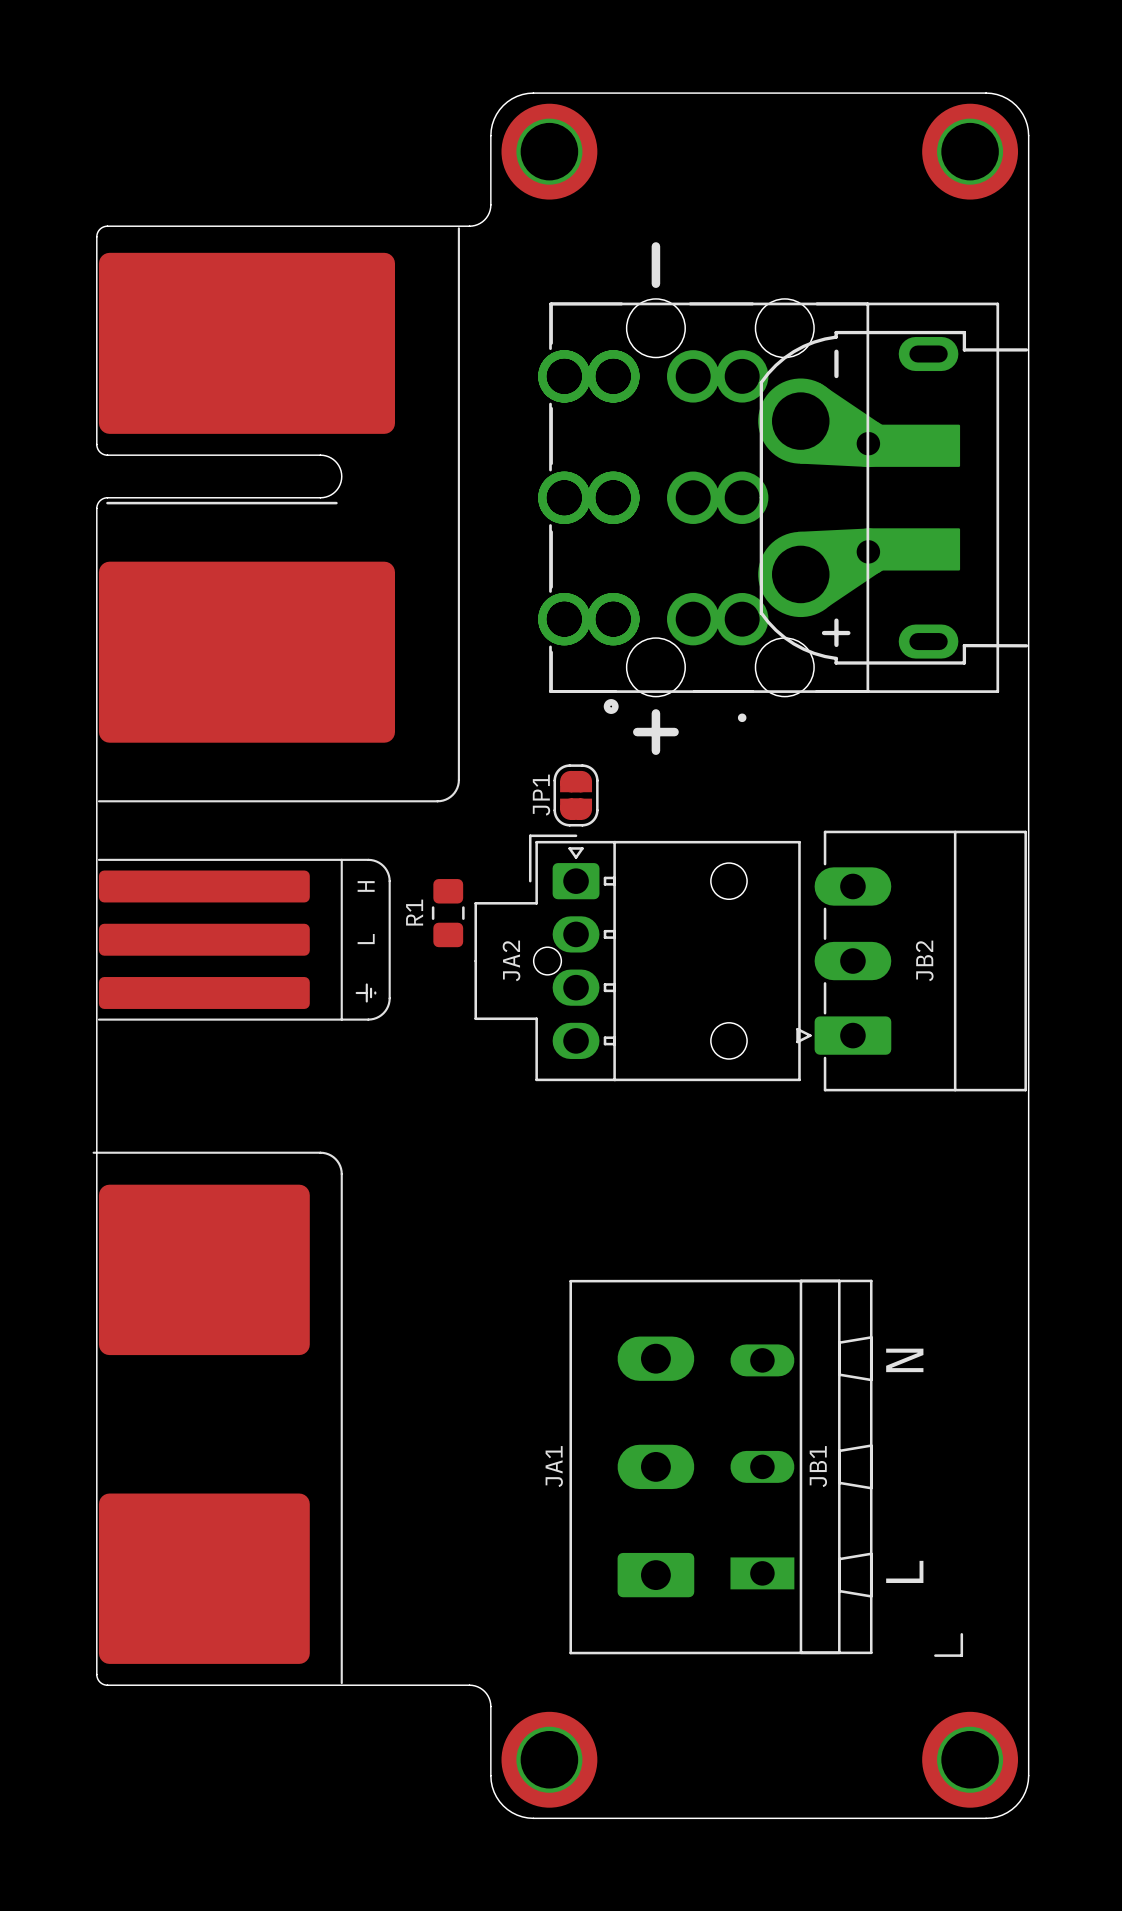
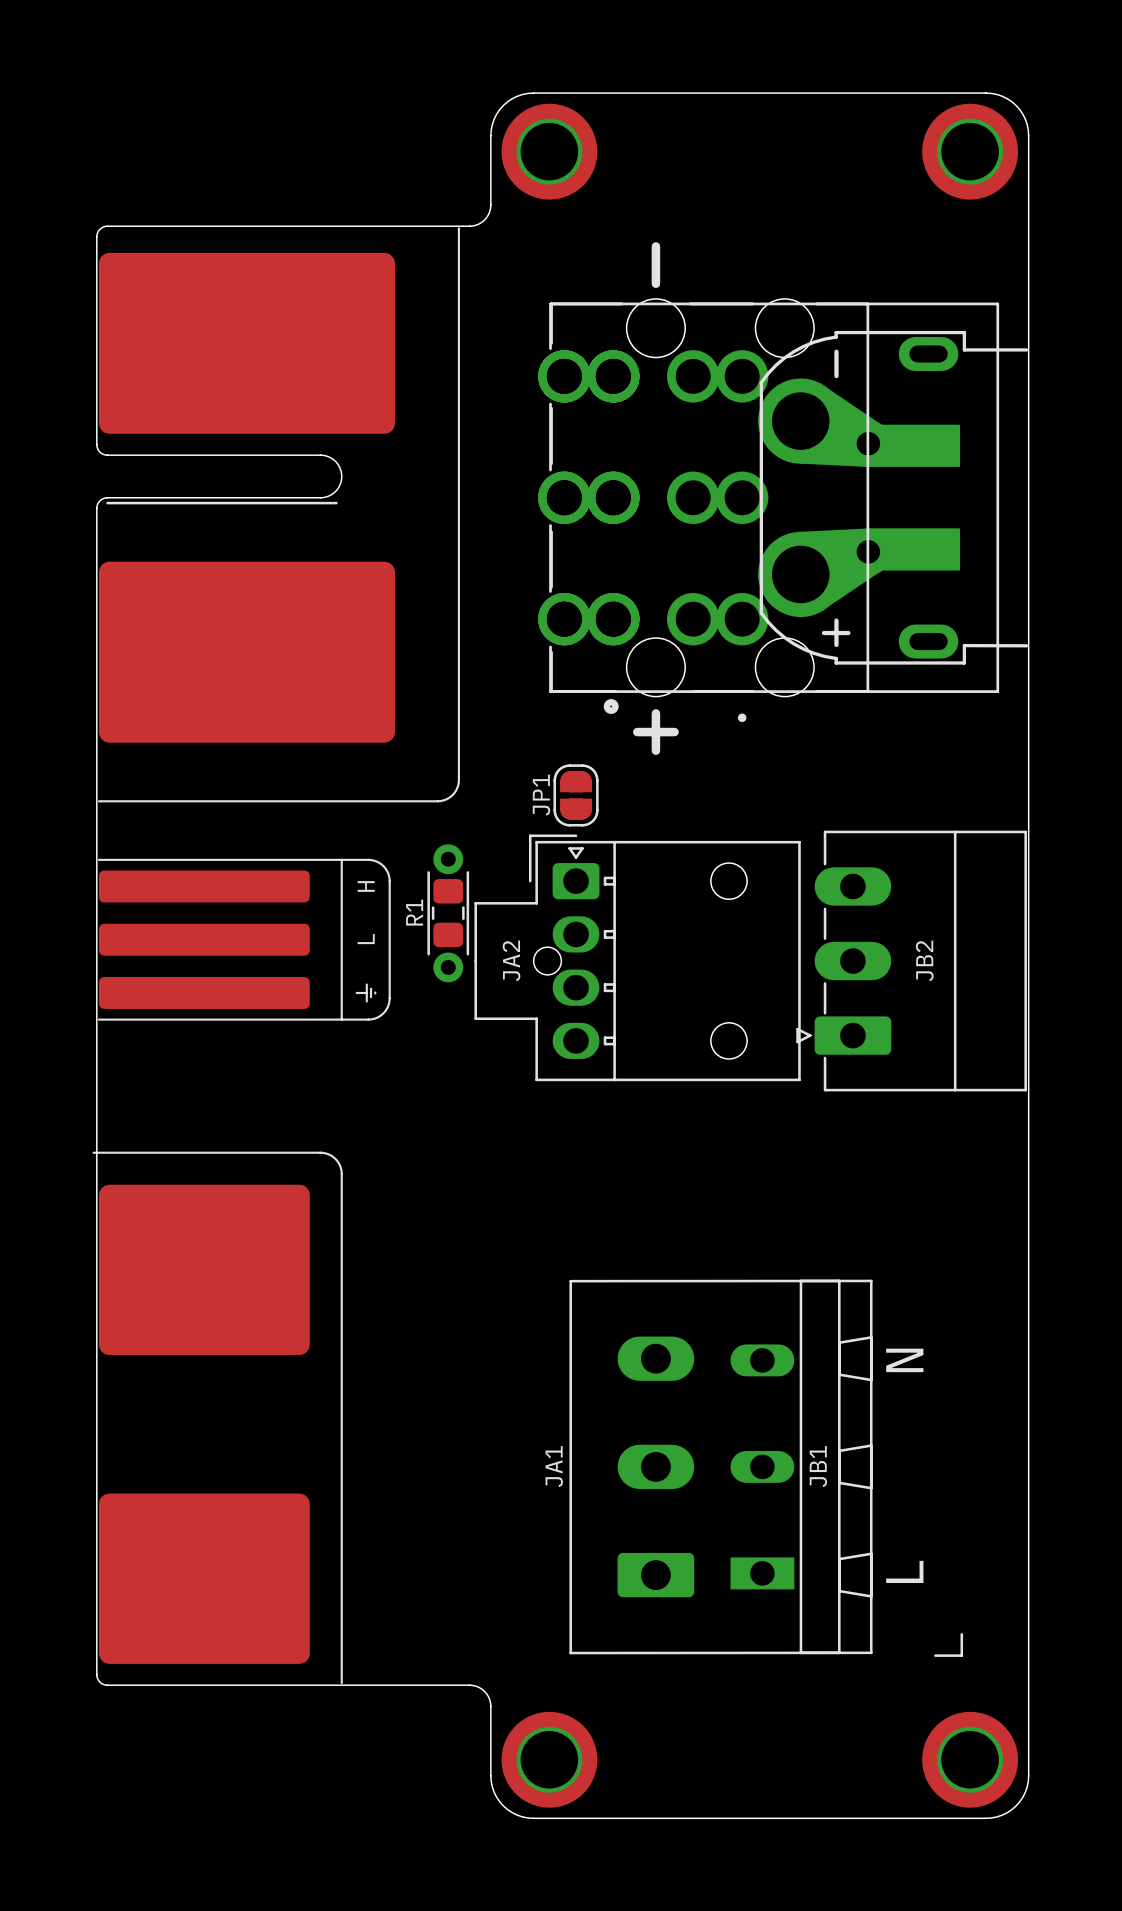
part: none -> (448, 913)

